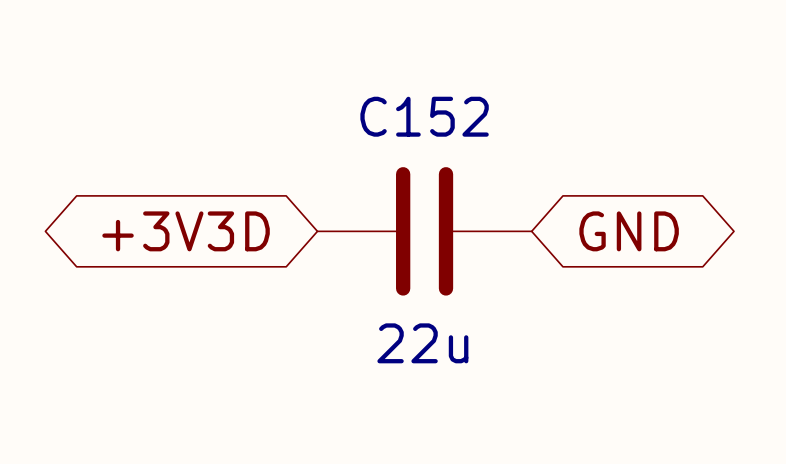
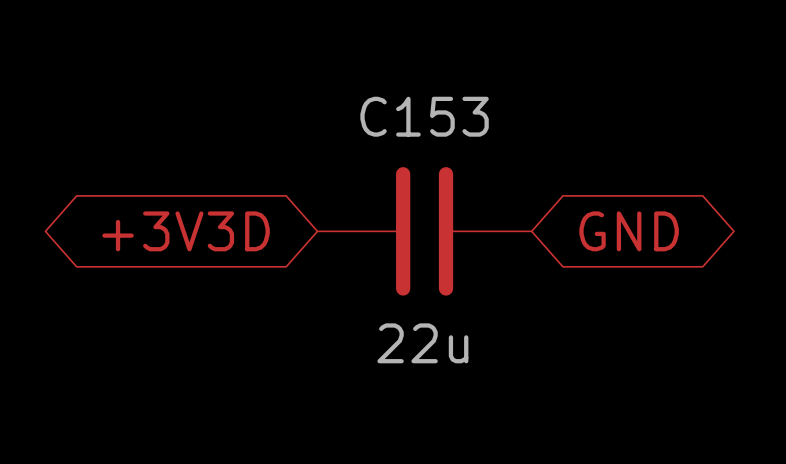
C152 name: C152 (424, 116) -> C153 (424, 116)

